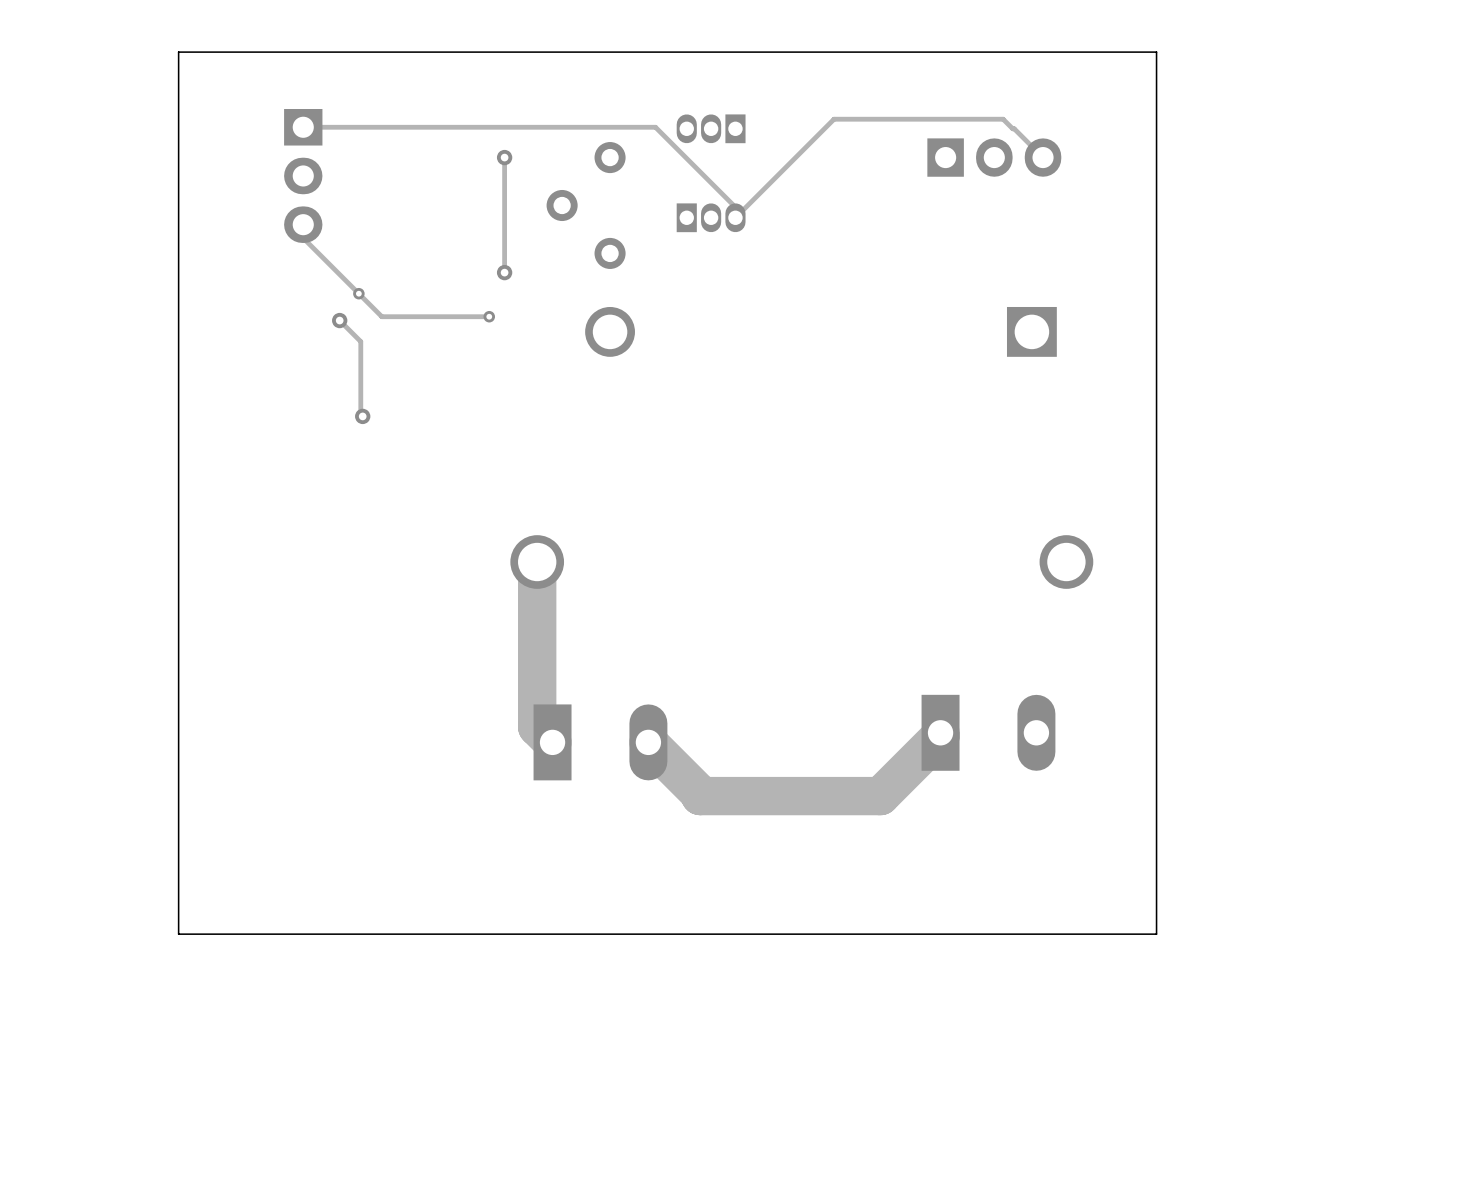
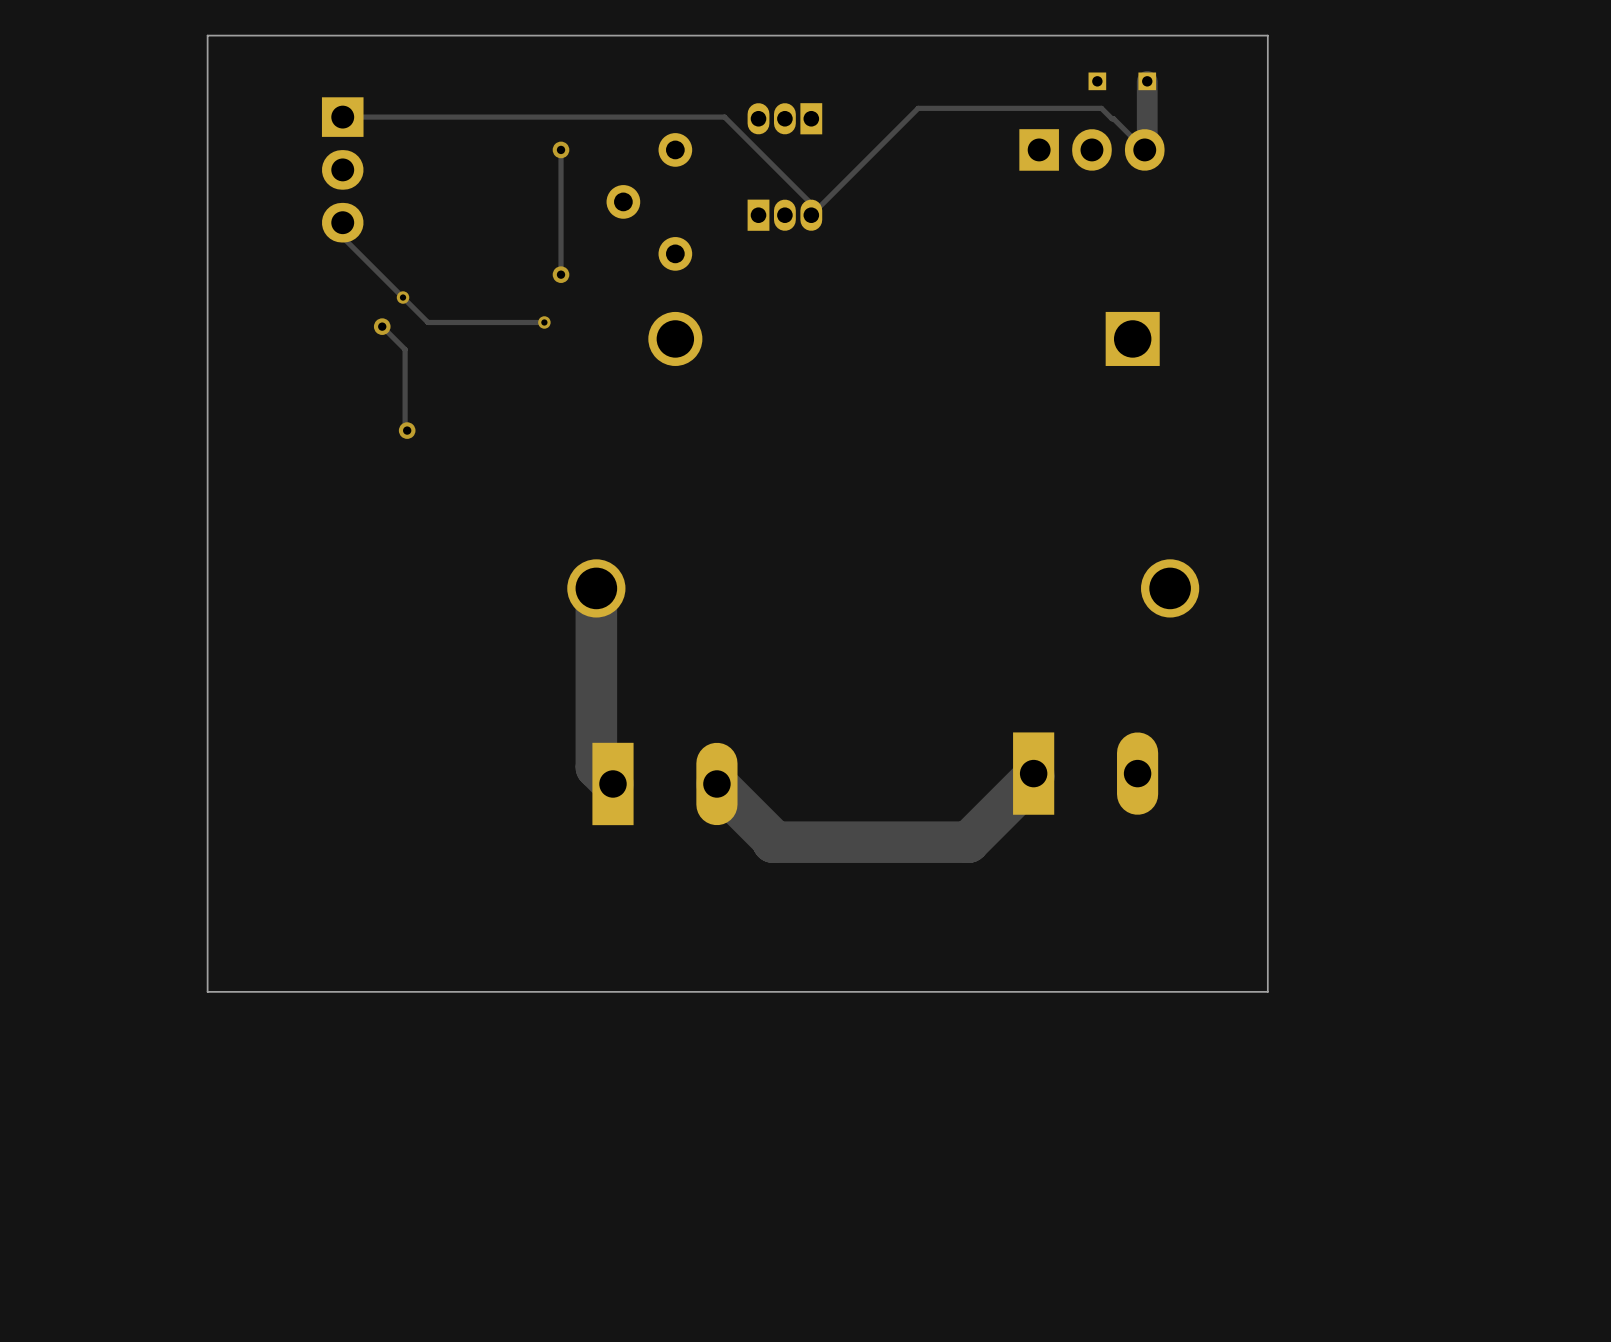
part: none -> (1097, 81)
track: none -> (1147, 81) (1147, 147)
part: none -> (1147, 81)

